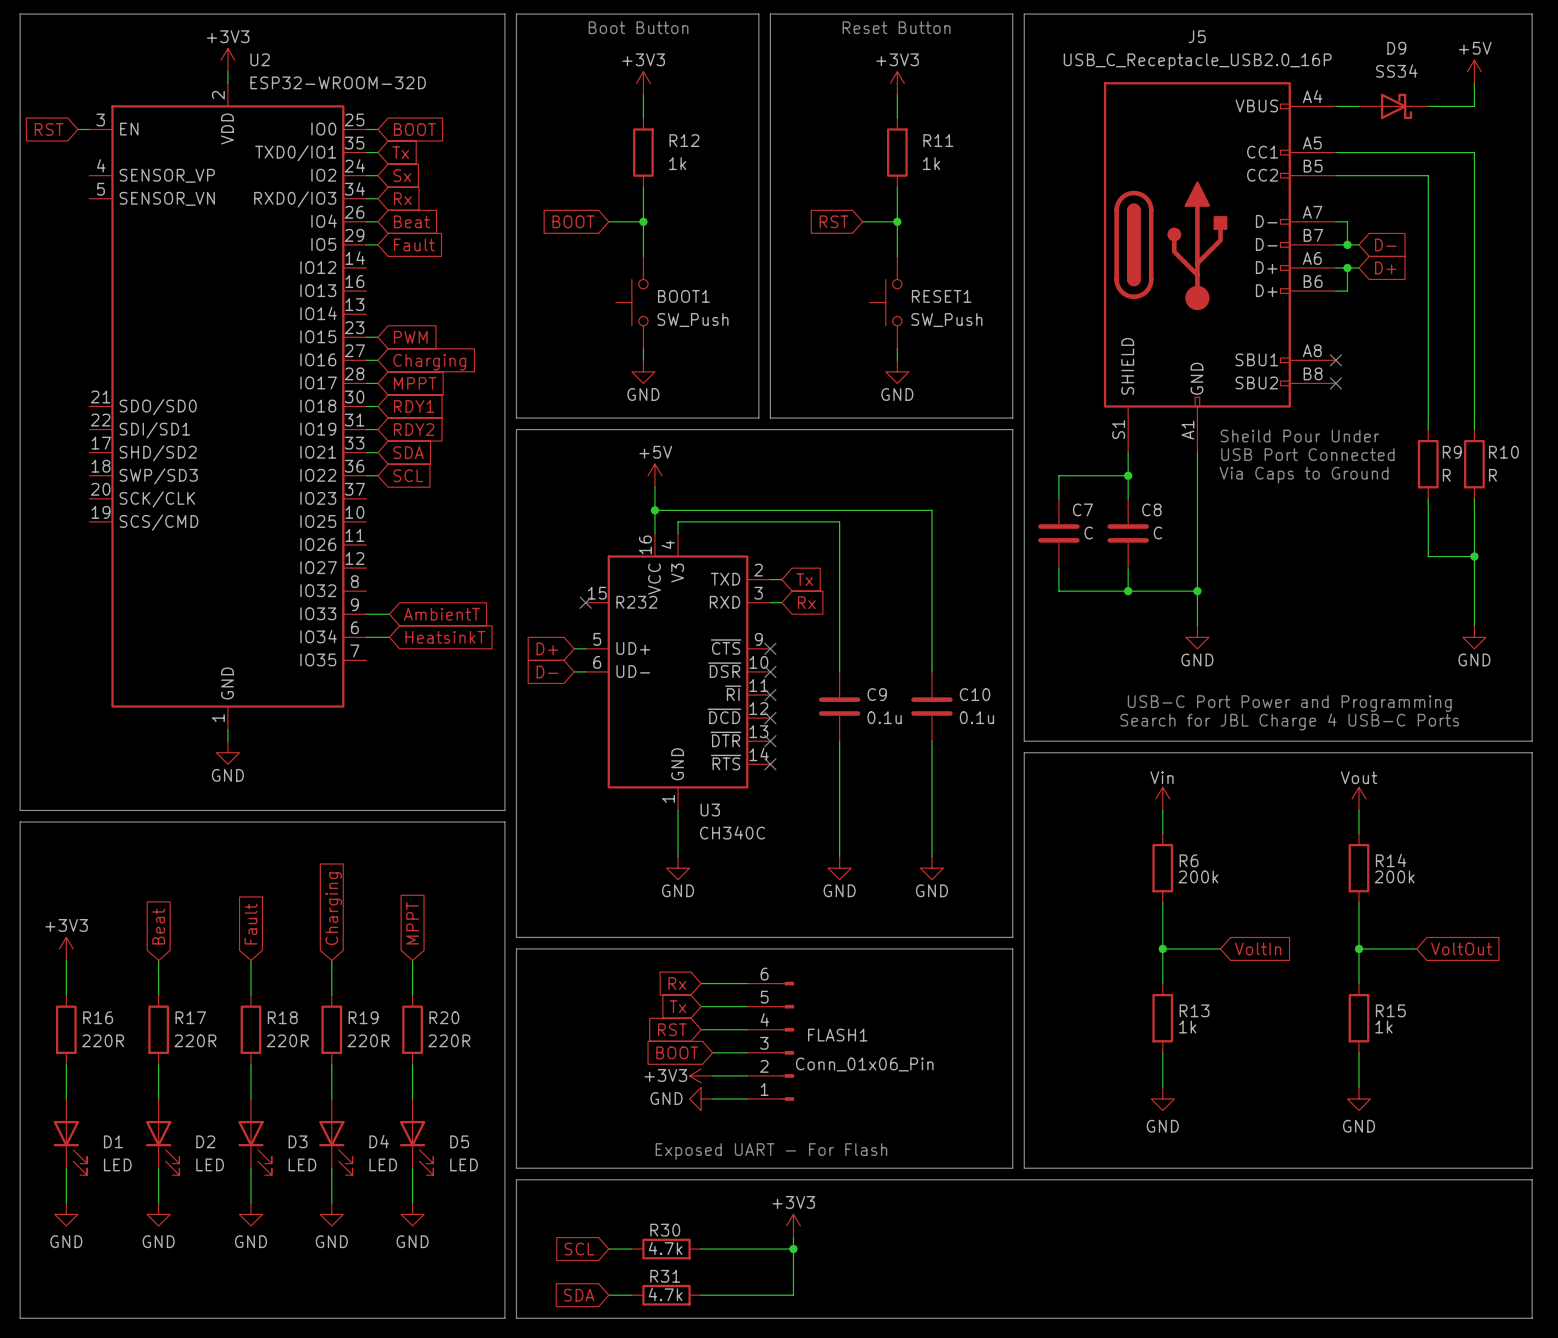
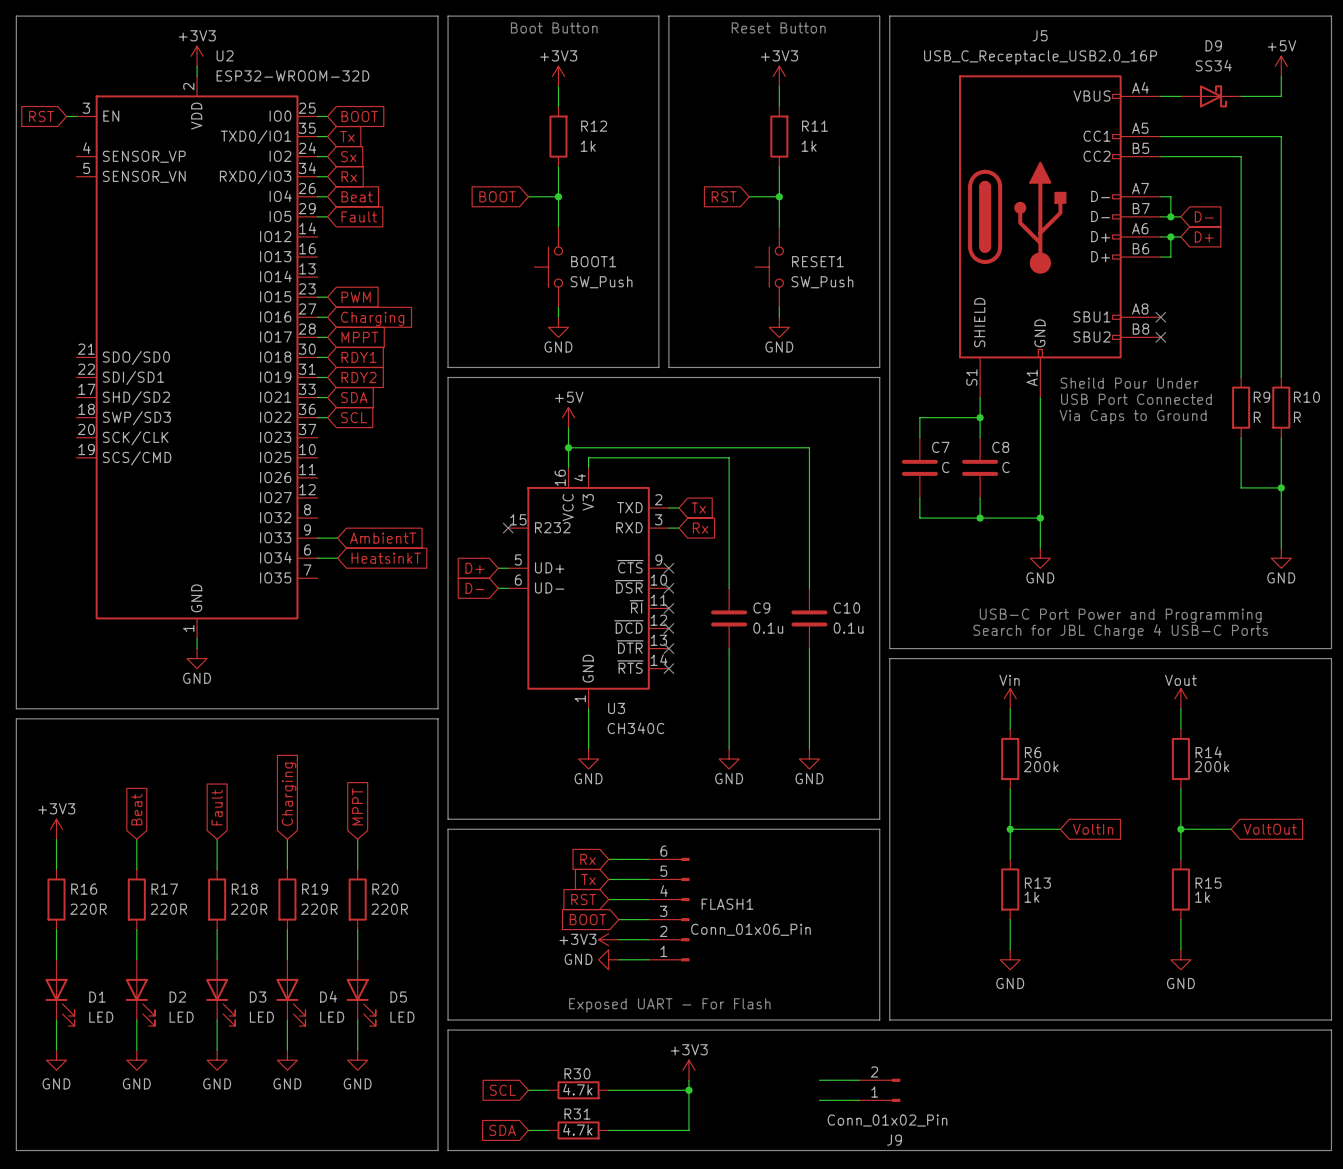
wire: none -> (819, 1080) (859, 1080)
J9: none -> Conn_01x02_Pin (880, 1090)
wire: none -> (819, 1100) (859, 1100)

